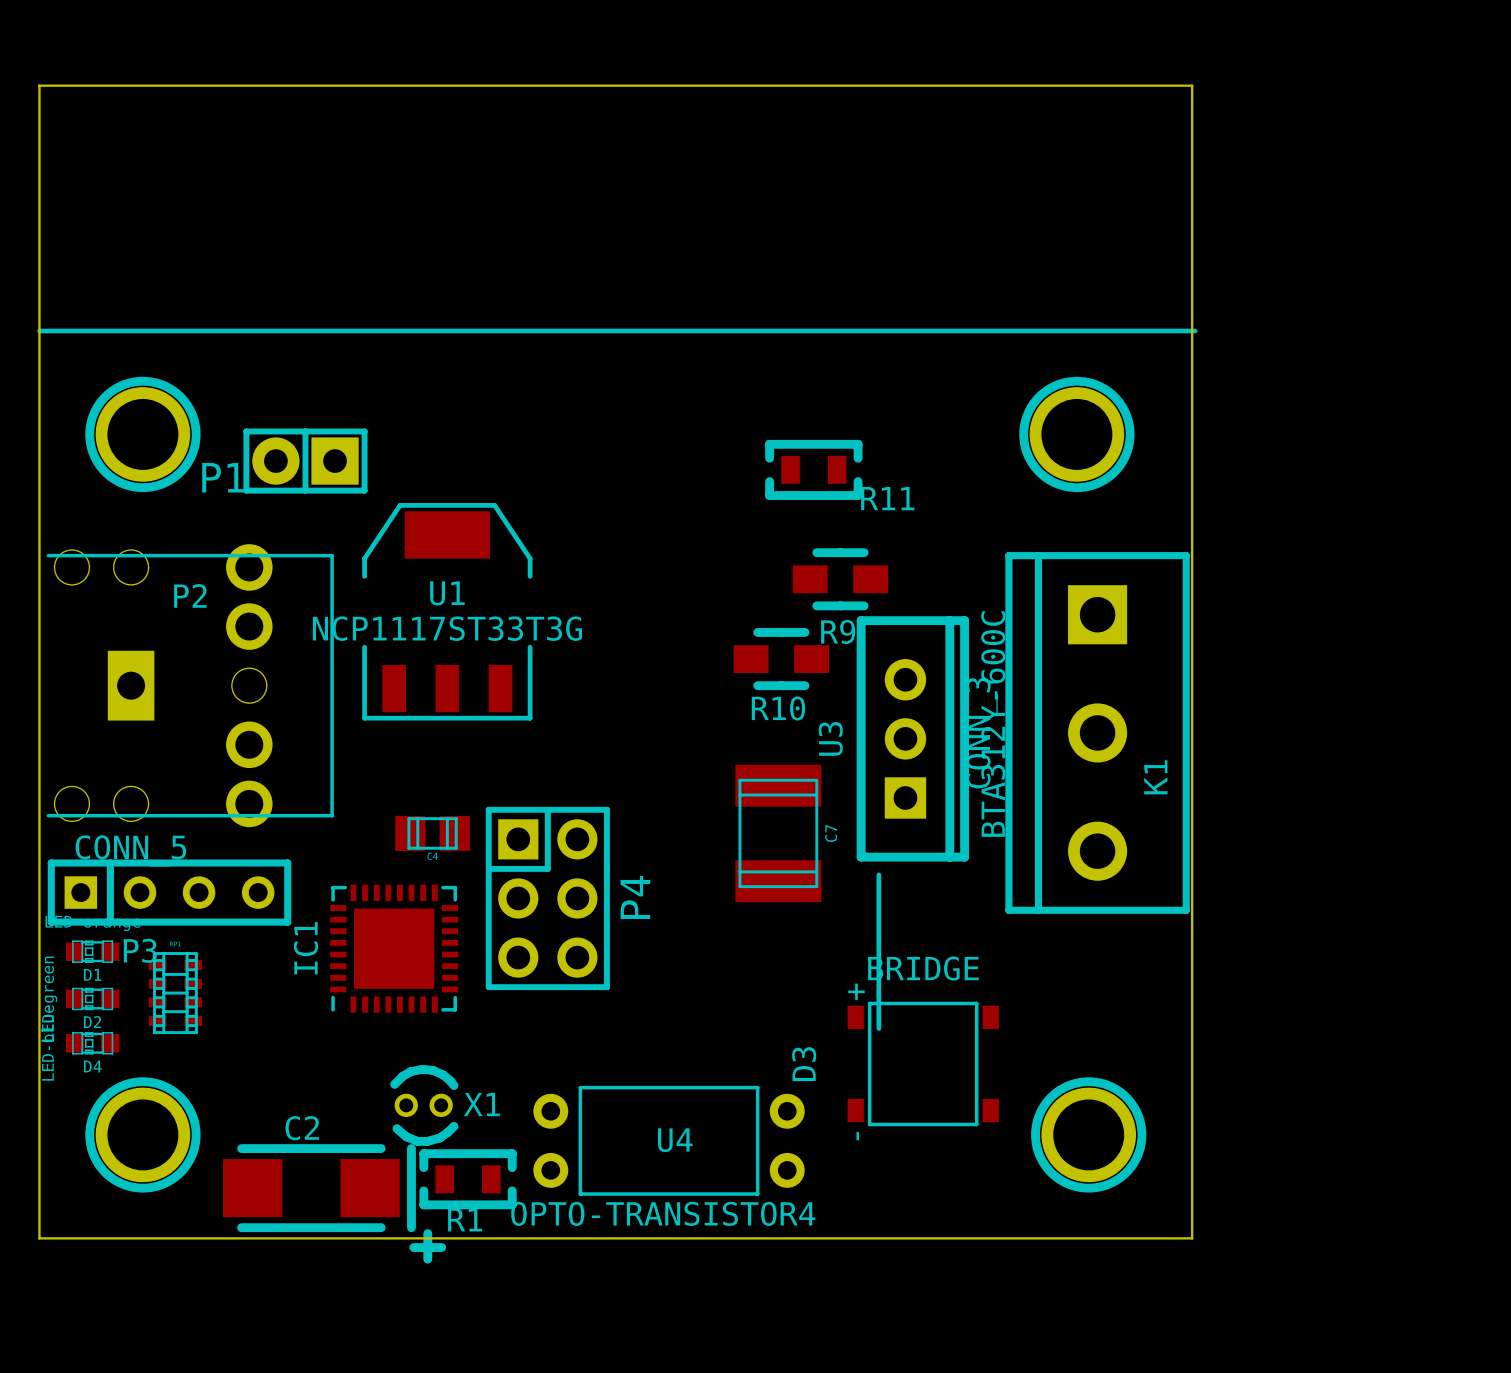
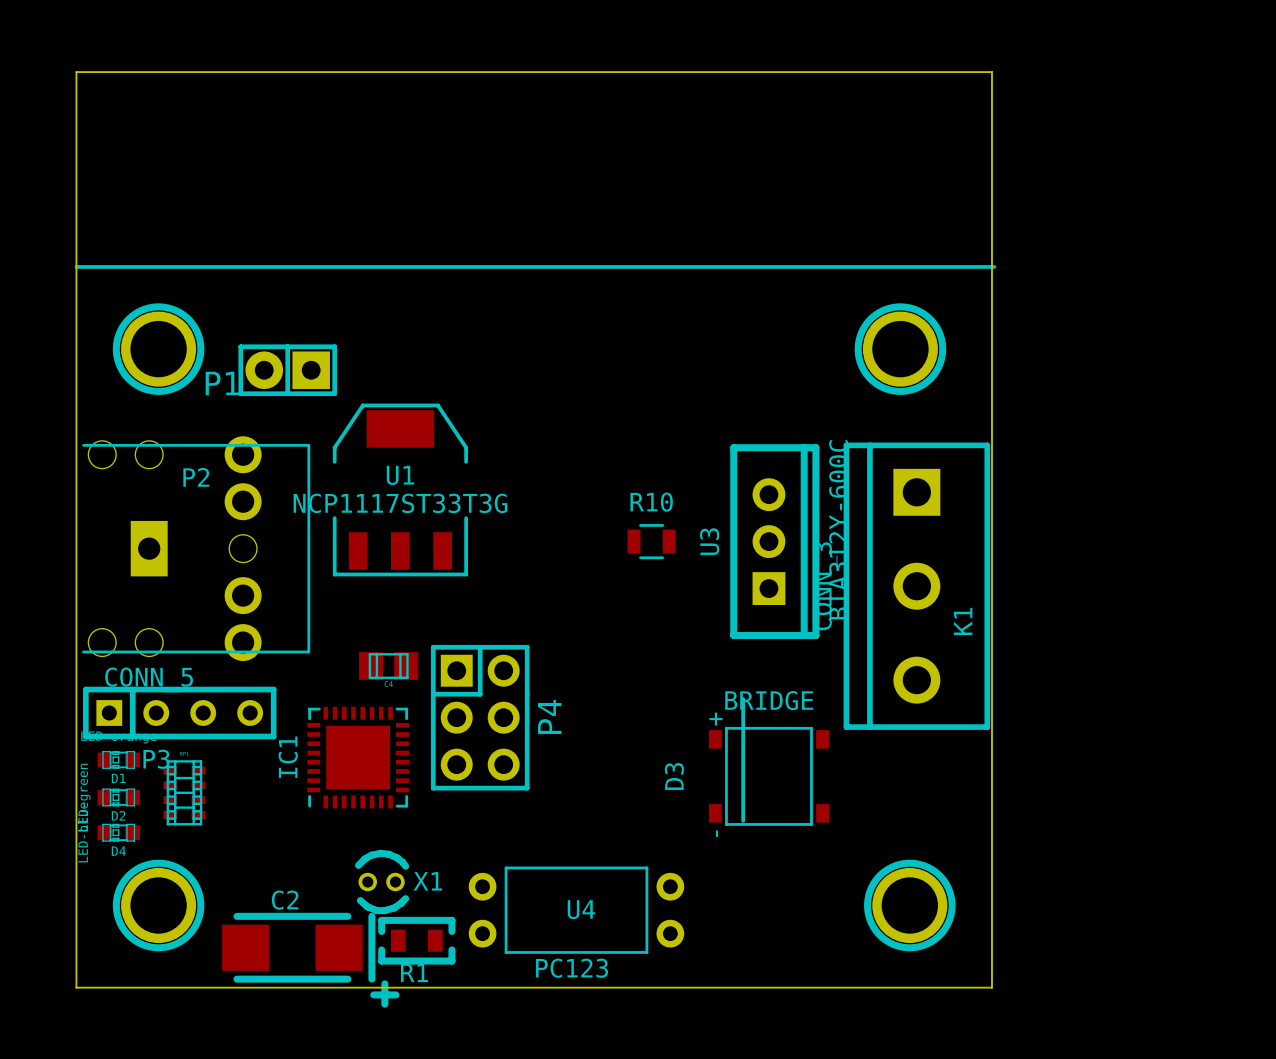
R11: (813, 469) -> none
R9: (840, 579) -> none
R10 footprint: [733, 628, 830, 691] -> [627, 524, 676, 560]
R10 name position: R10 (778, 708) -> R10 (651, 502)
U3 position: (912, 738) -> (774, 541)
C7: (778, 833) -> none
D3 position: (923, 1063) -> (768, 776)
U4 value: OPTO-TRANSISTOR4 (663, 1213) -> PC123 (572, 968)

